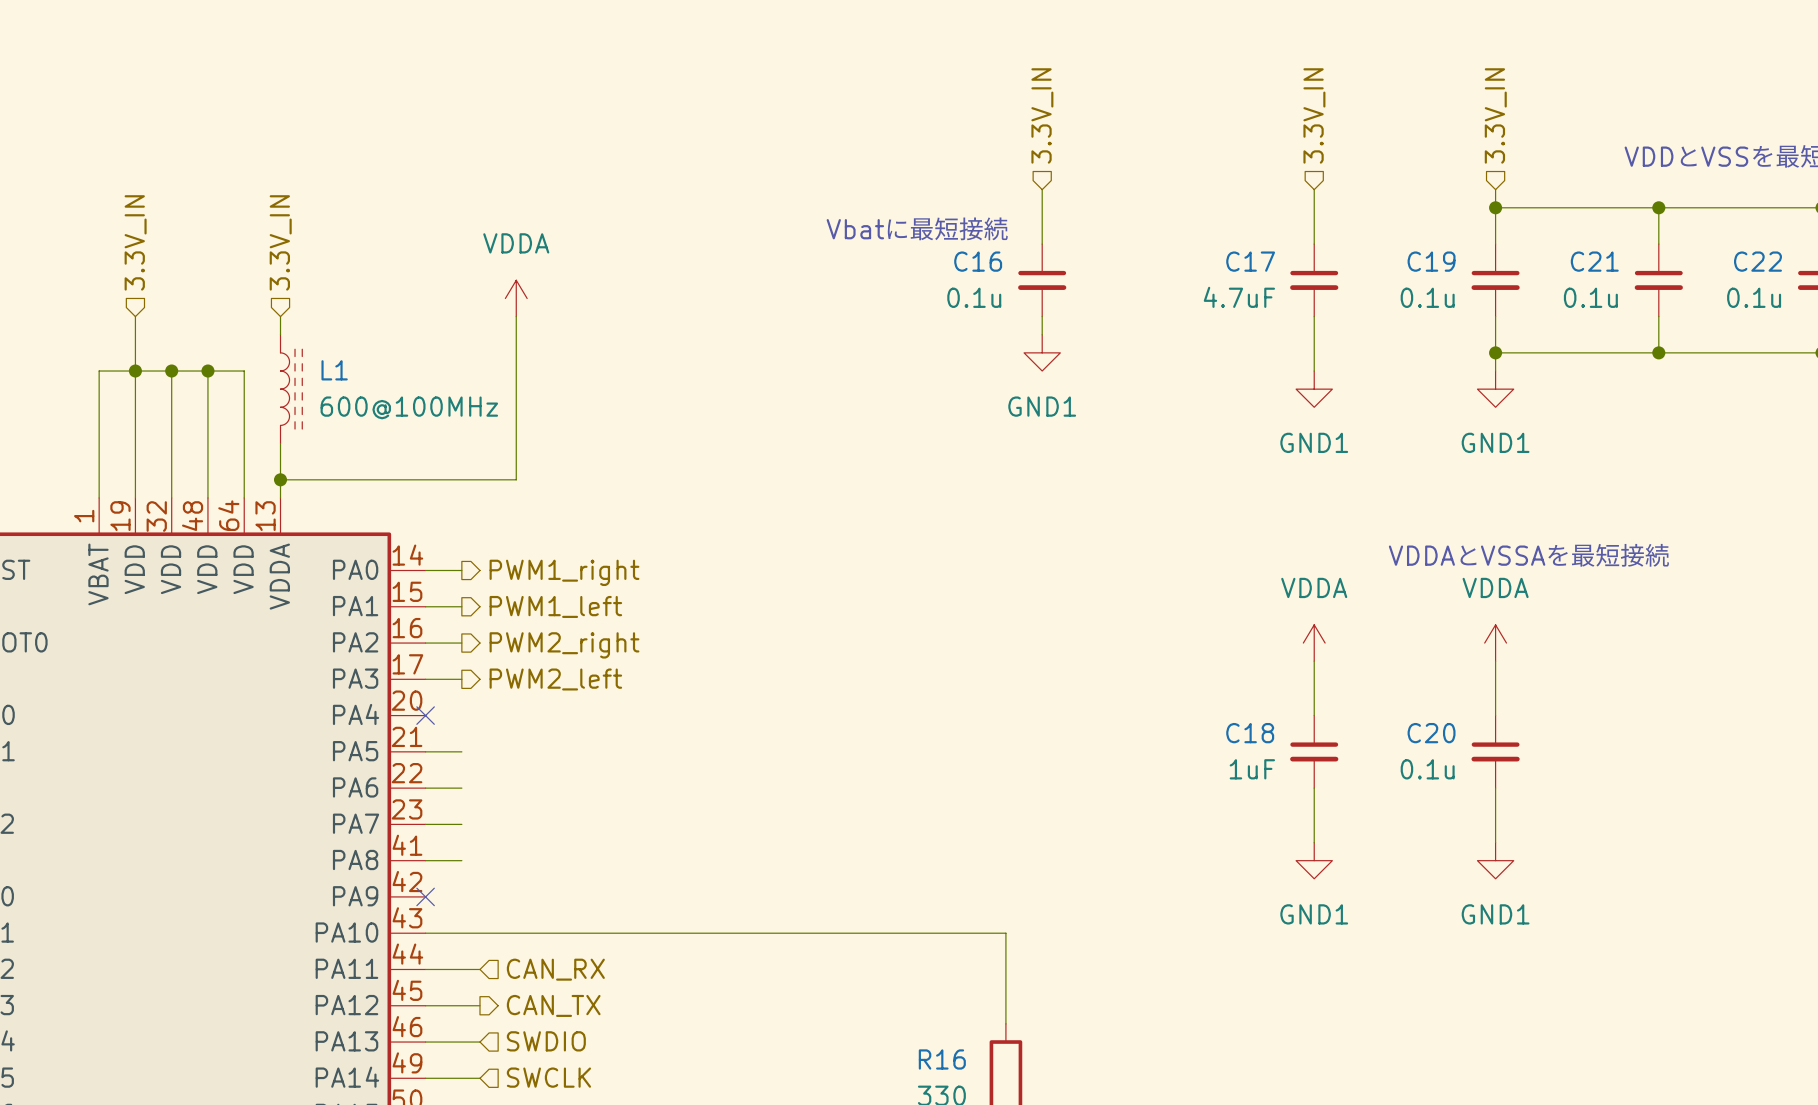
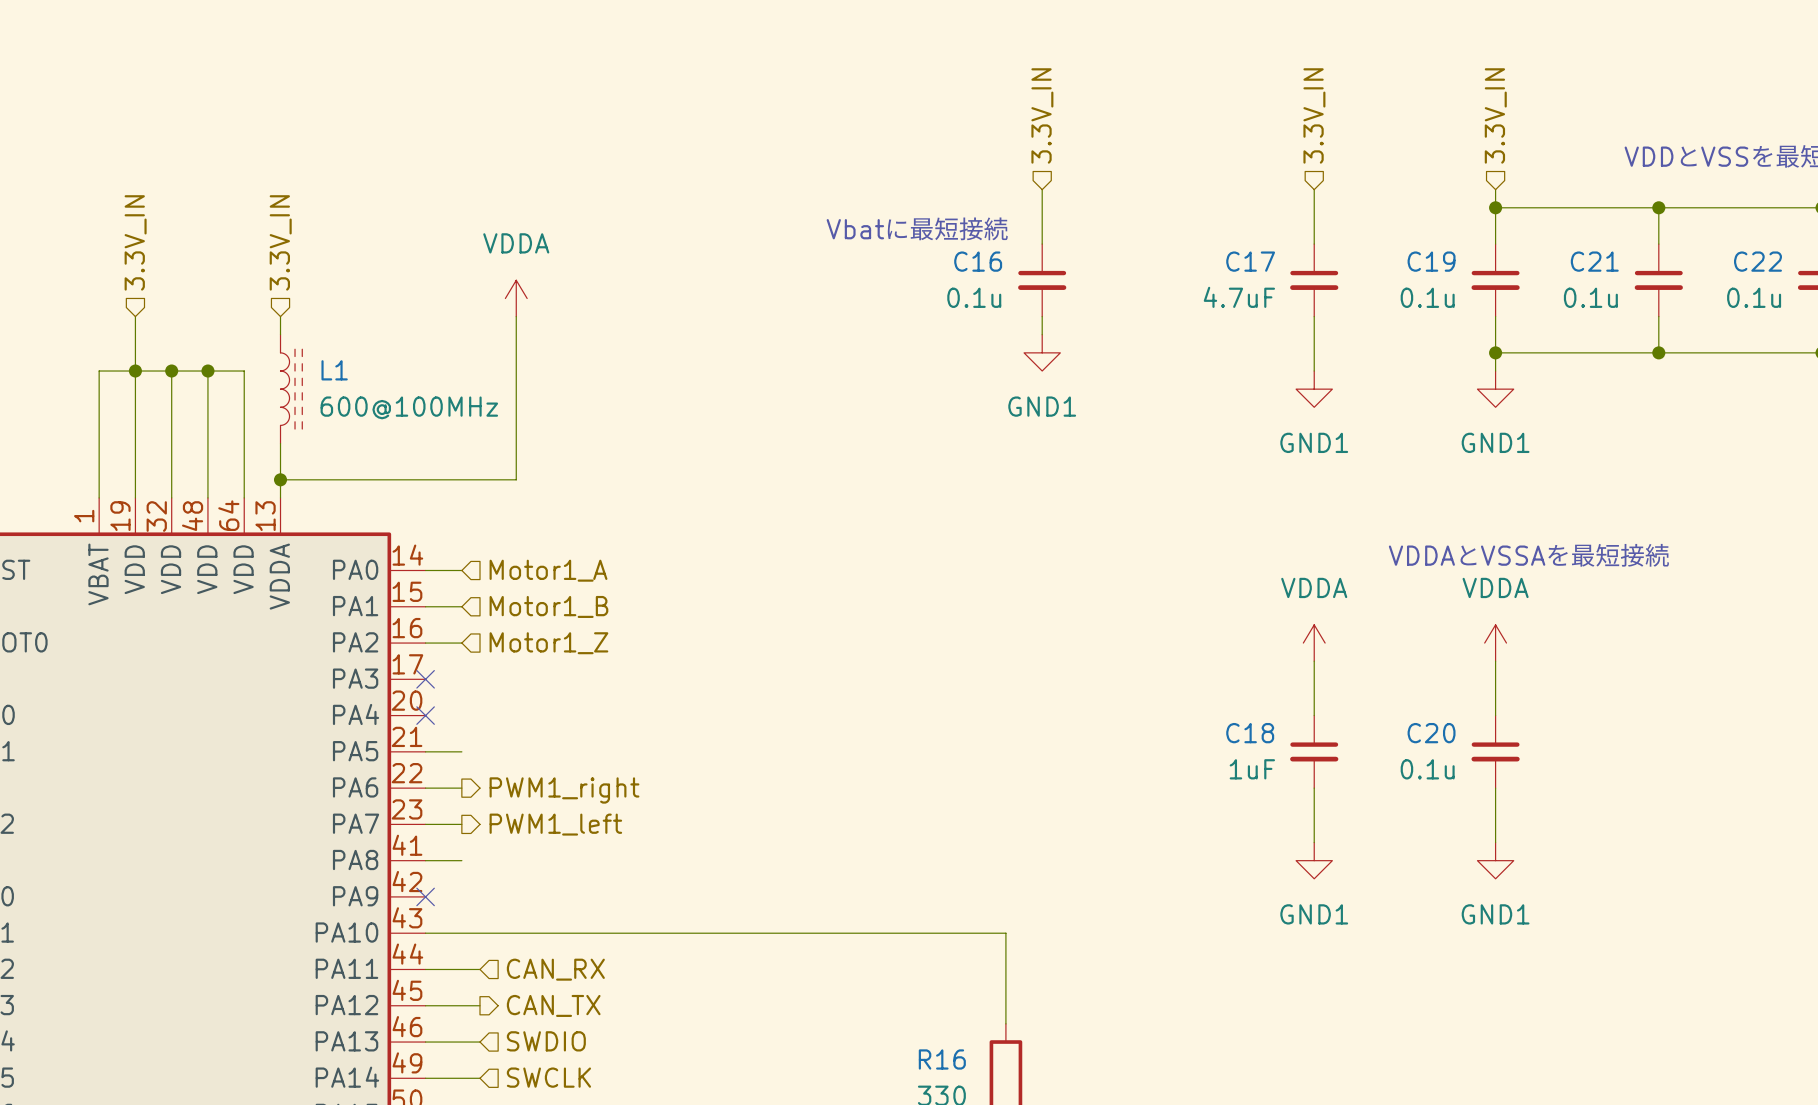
hierarchical label shape: output (564, 572) -> input (548, 570)
hierarchical label: PWM1_right (564, 572) -> Motor1_A (548, 570)
hierarchical label shape: output (555, 606) -> input (548, 606)
hierarchical label: PWM1_left (555, 606) -> Motor1_B (548, 606)
hierarchical label shape: output (564, 645) -> input (548, 643)
hierarchical label: PWM2_right (564, 645) -> Motor1_Z (548, 643)
wire: (425, 679) (461, 679) -> none
no-connect mark: none -> (425, 679)
hierarchical label: PWM2_left (555, 679) -> none
hierarchical label: none -> PWM1_right (564, 790)
hierarchical label: none -> PWM1_left (555, 824)

